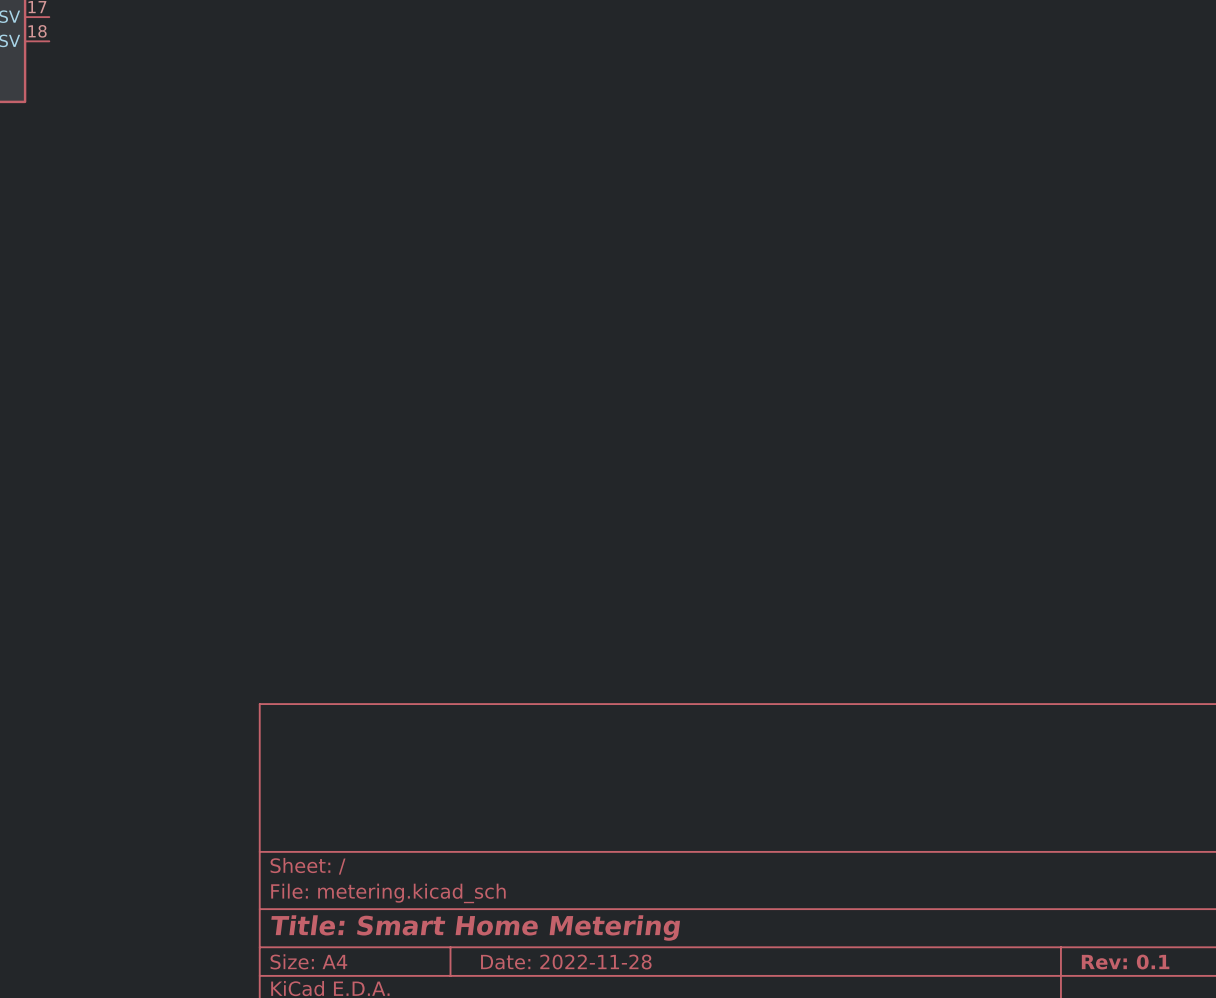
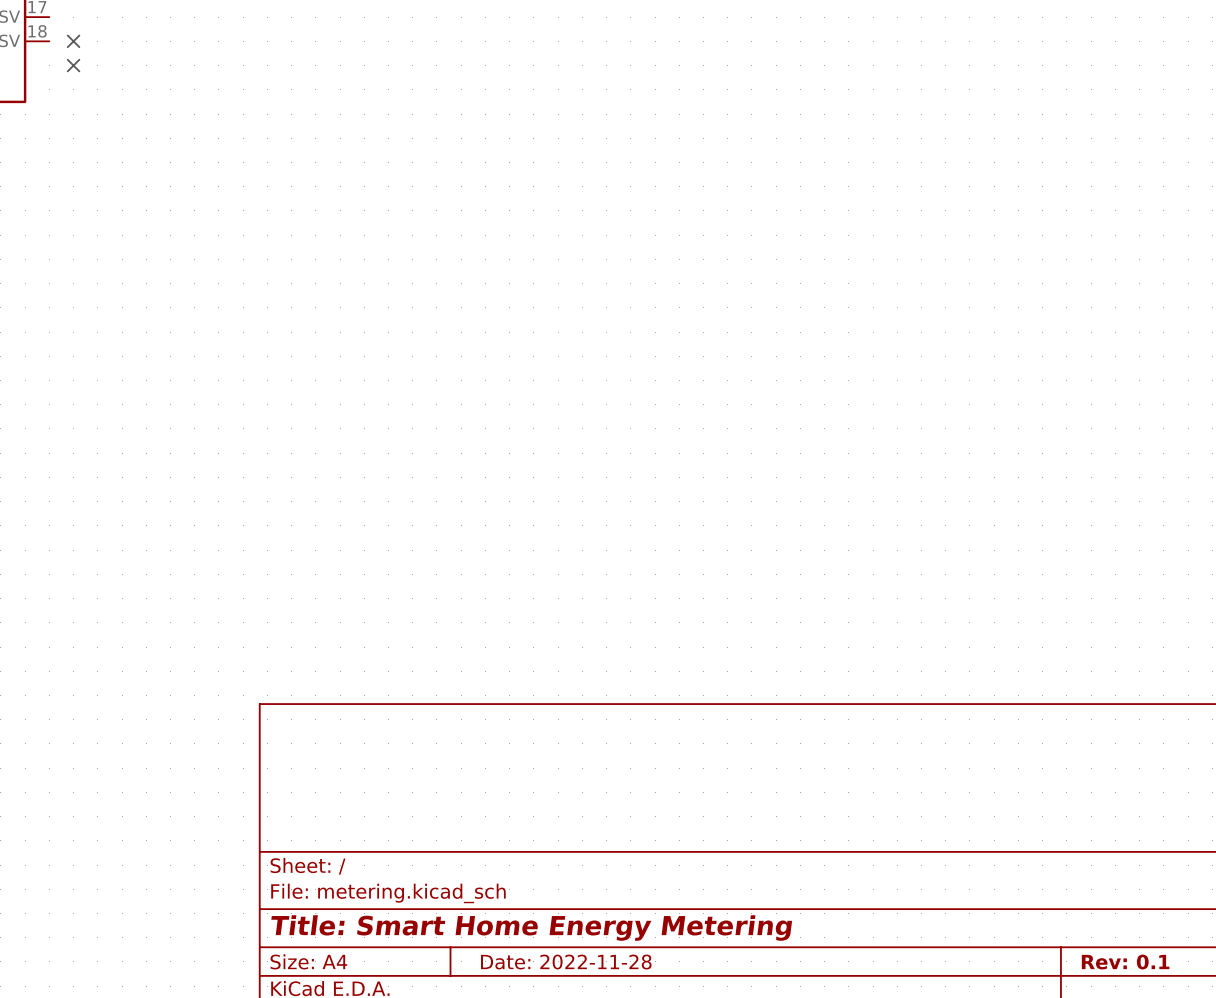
no-connect mark: none -> (73, 41)
no-connect mark: none -> (73, 65)
title block: Title: Smart Home Metering (475, 928) -> Title: Smart Home Energy Metering (531, 928)

